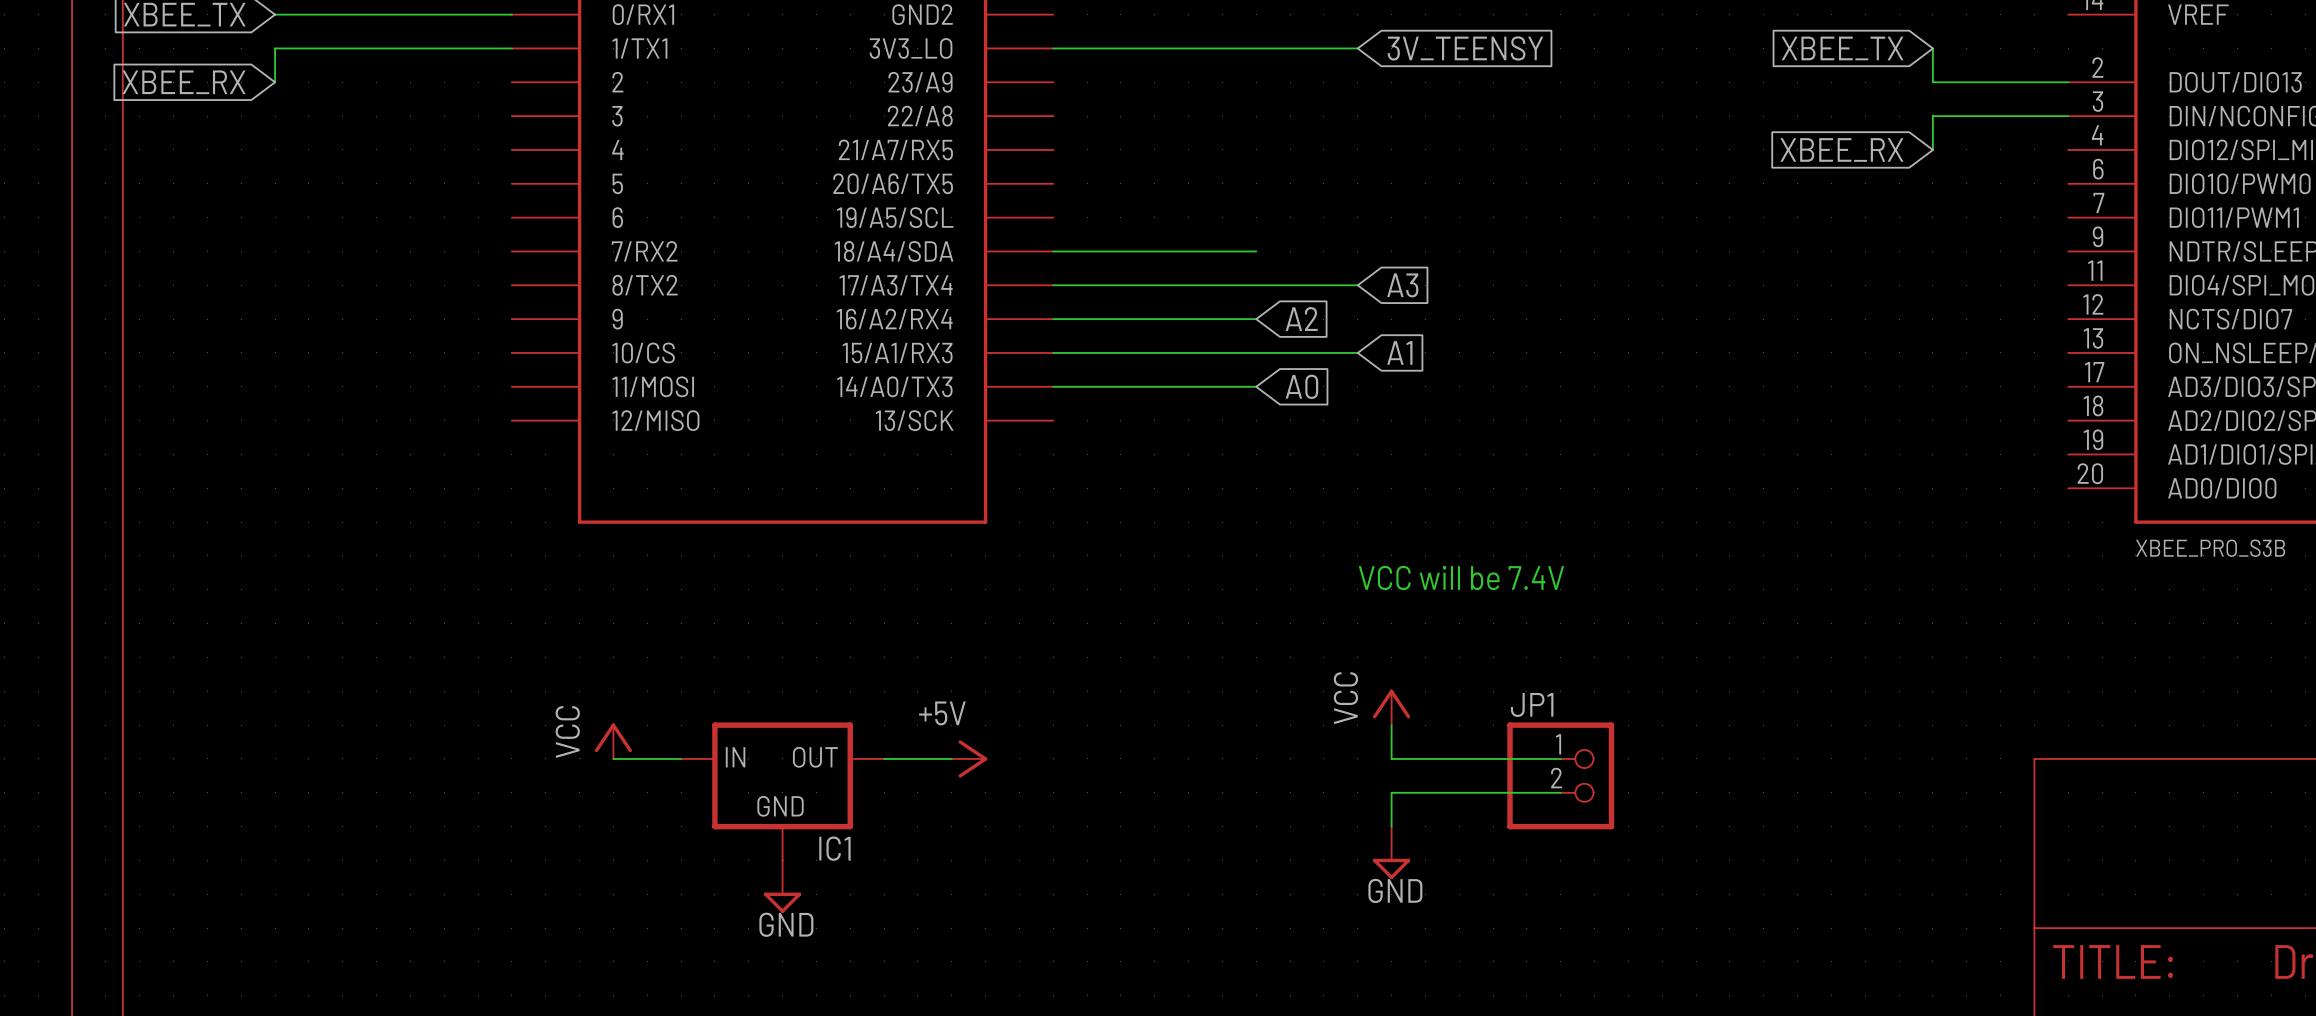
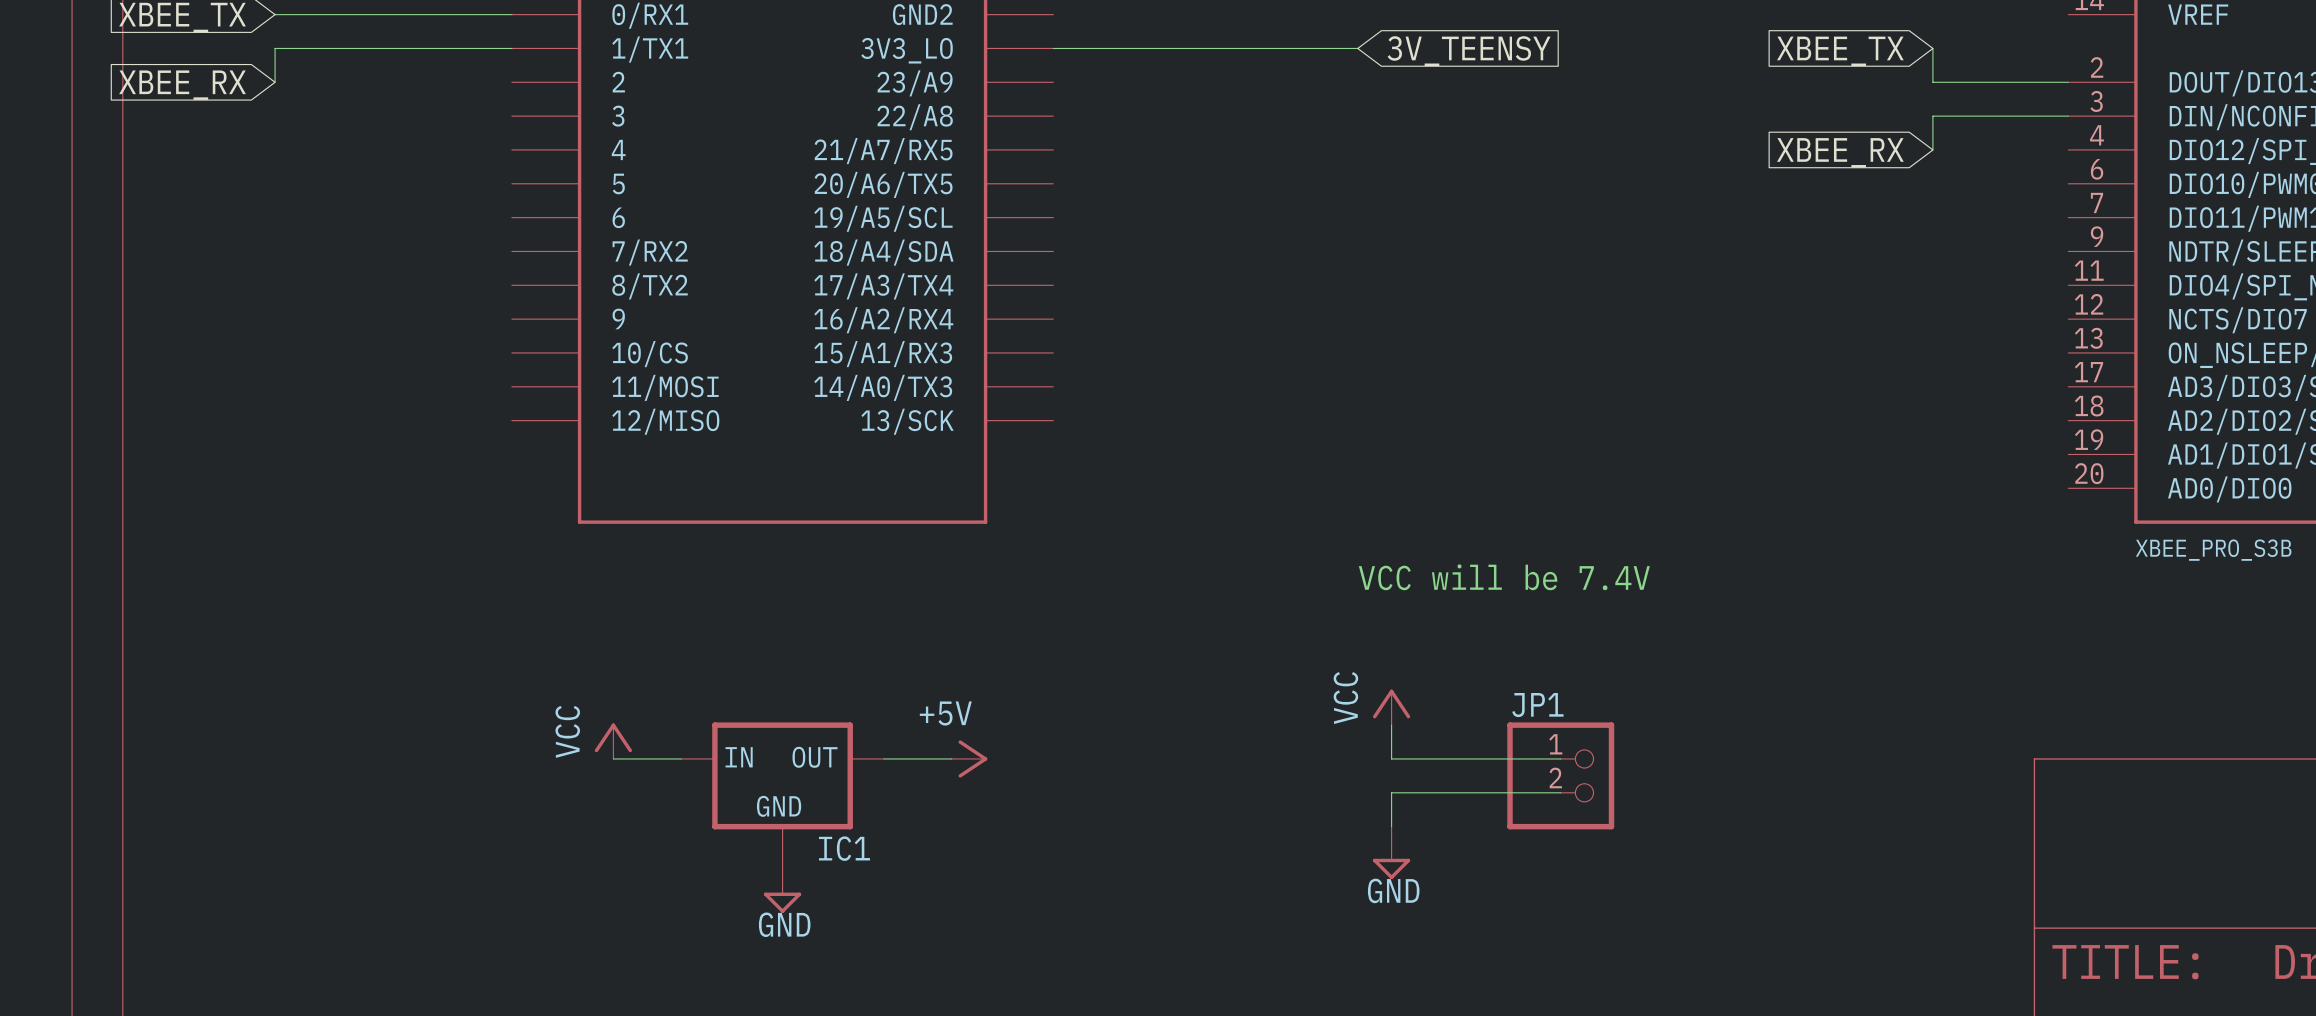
wire: (1053, 251) (1256, 251) -> none
wire: (1053, 285) (1357, 285) -> none
global label: A3 (1402, 285) -> none
wire: (1053, 319) (1256, 319) -> none
global label: A2 (1301, 319) -> none
wire: (1053, 352) (1357, 352) -> none
global label: A1 (1399, 352) -> none
wire: (1053, 386) (1256, 386) -> none
global label: A0 (1301, 386) -> none

